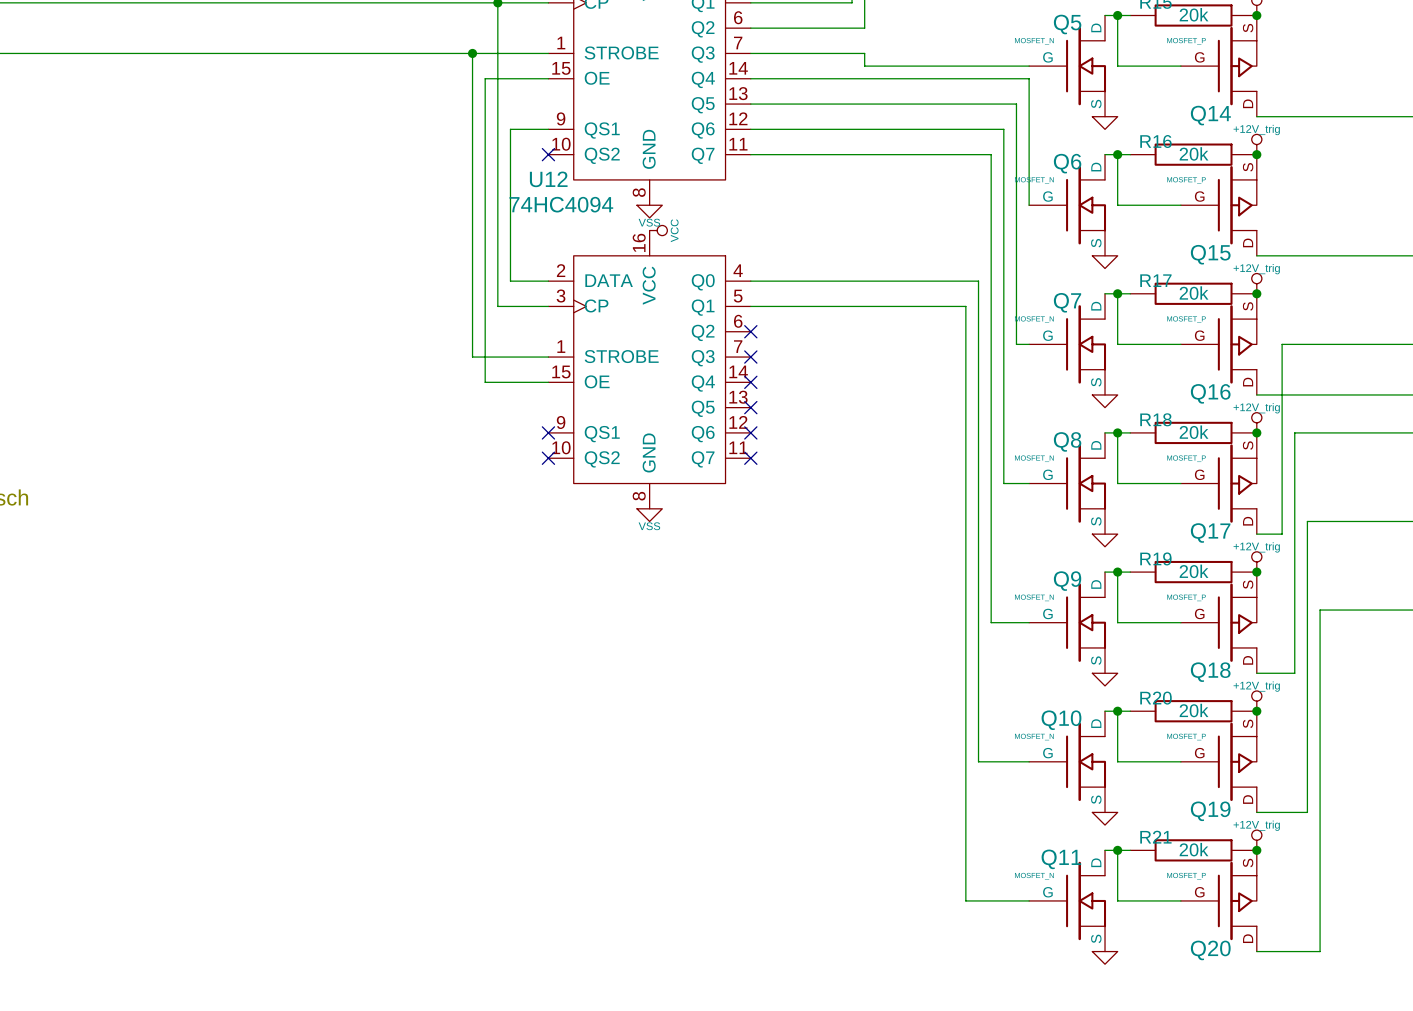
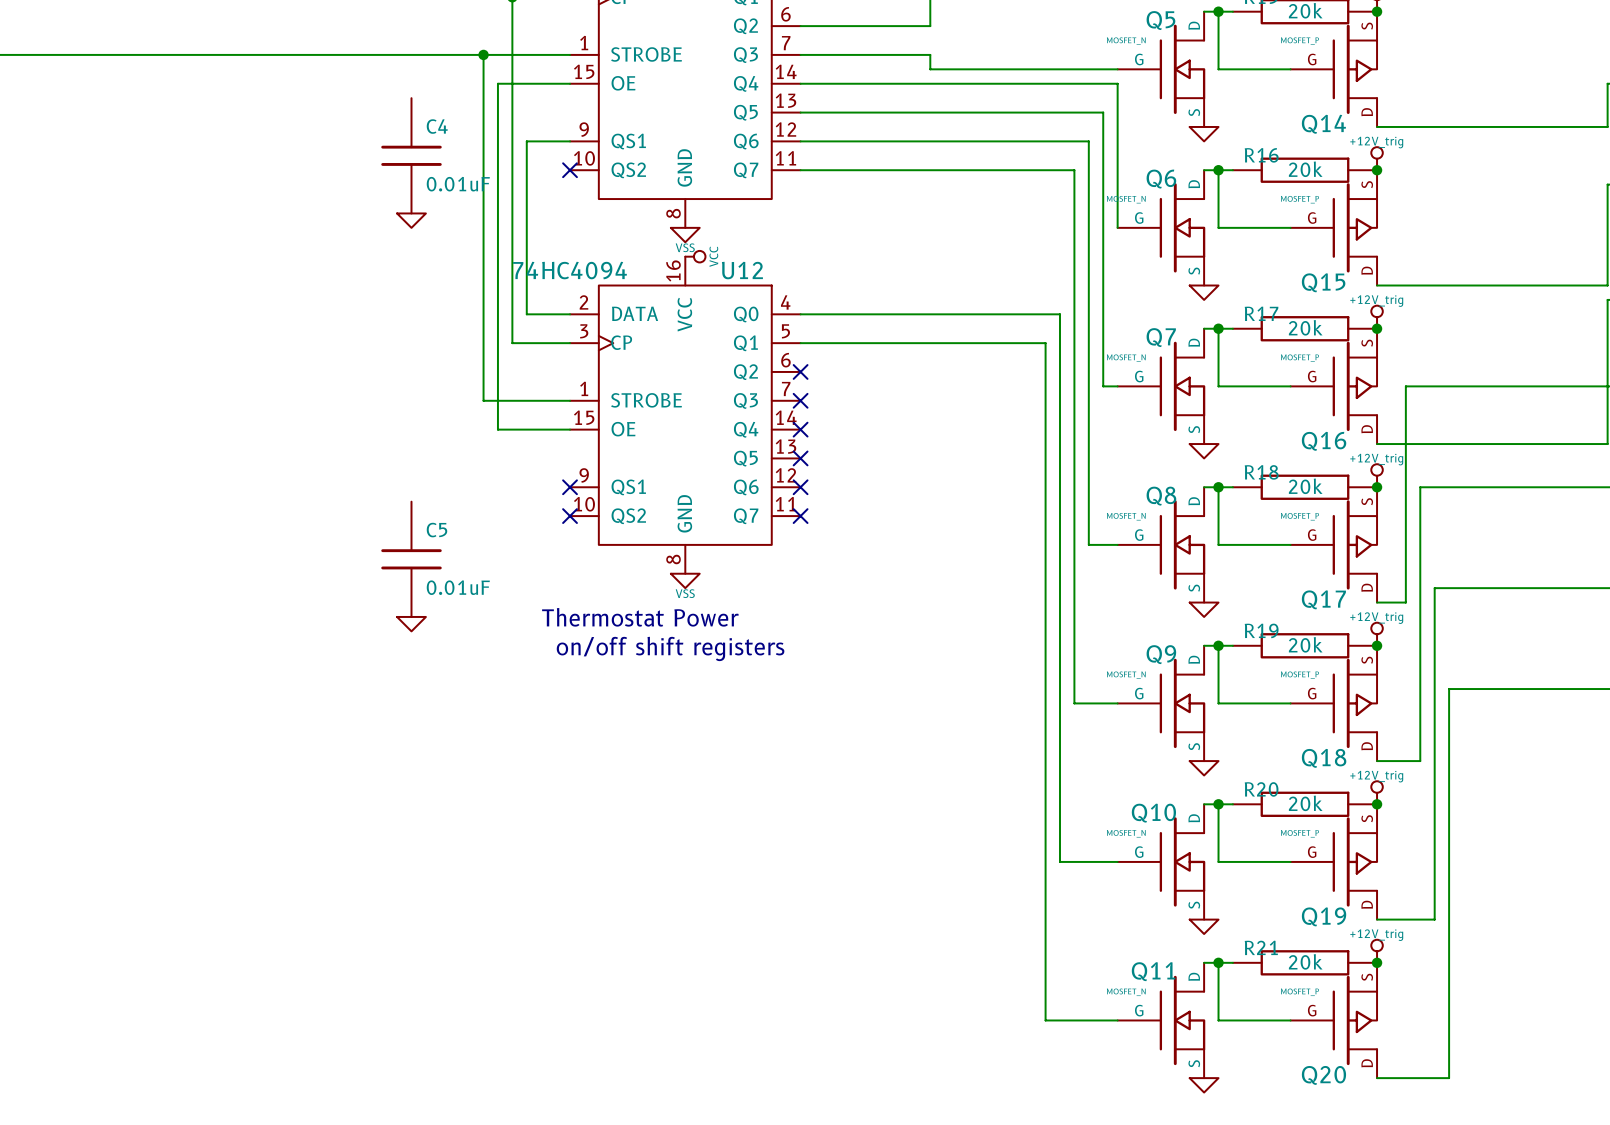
C4: none -> 0.01uF (411, 155)
U12 name position: U12 (548, 179) -> U12 (742, 270)
power symbol: none -> (411, 220)
U12 value position: 74HC4094 (561, 204) -> 74HC4094 (570, 270)
C5: none -> 0.01uF (411, 559)
text: none -> Thermostat Power (640, 617)
power symbol: none -> (411, 624)
text: none -> on/off shift registers (670, 648)

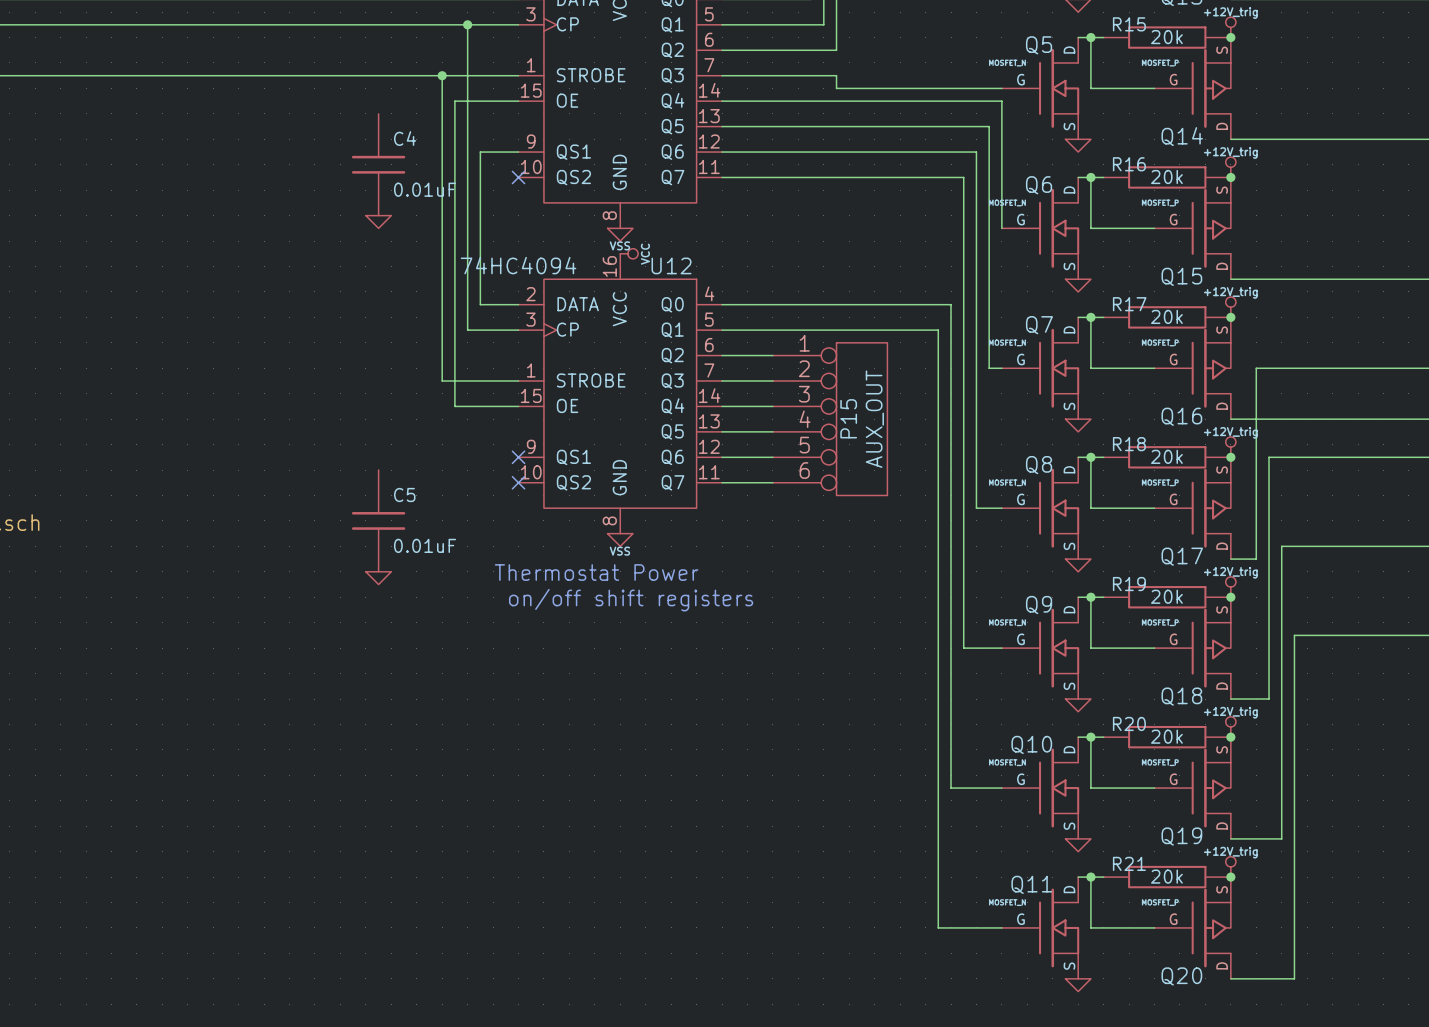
wire: none -> (722, 355) (772, 355)
no-connect mark: (800, 371) -> none
wire: none -> (722, 380) (772, 380)
no-connect mark: (800, 400) -> none
wire: none -> (722, 406) (772, 406)
no-connect mark: (800, 429) -> none
P15: none -> AUX_OUT (830, 419)
wire: none -> (722, 431) (772, 431)
no-connect mark: (800, 458) -> none
wire: none -> (722, 457) (772, 457)
no-connect mark: (800, 487) -> none
wire: none -> (722, 482) (772, 482)
no-connect mark: (800, 516) -> none

